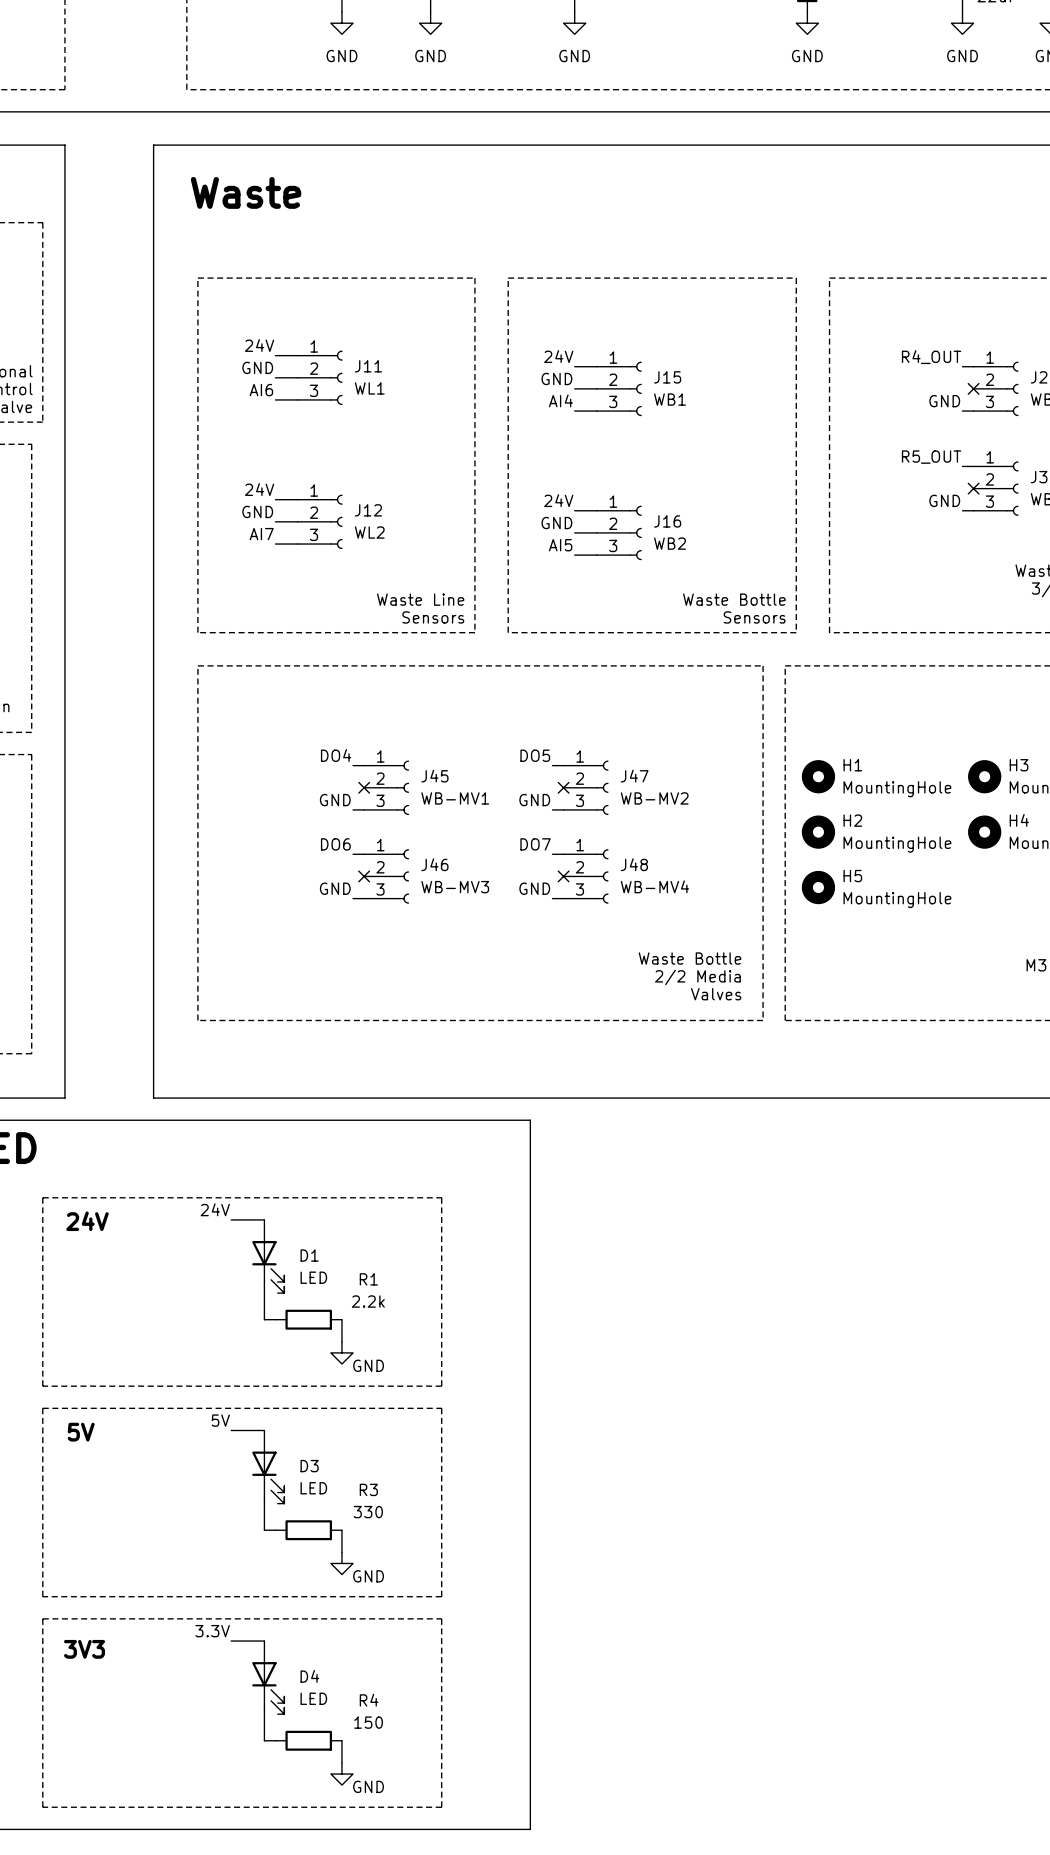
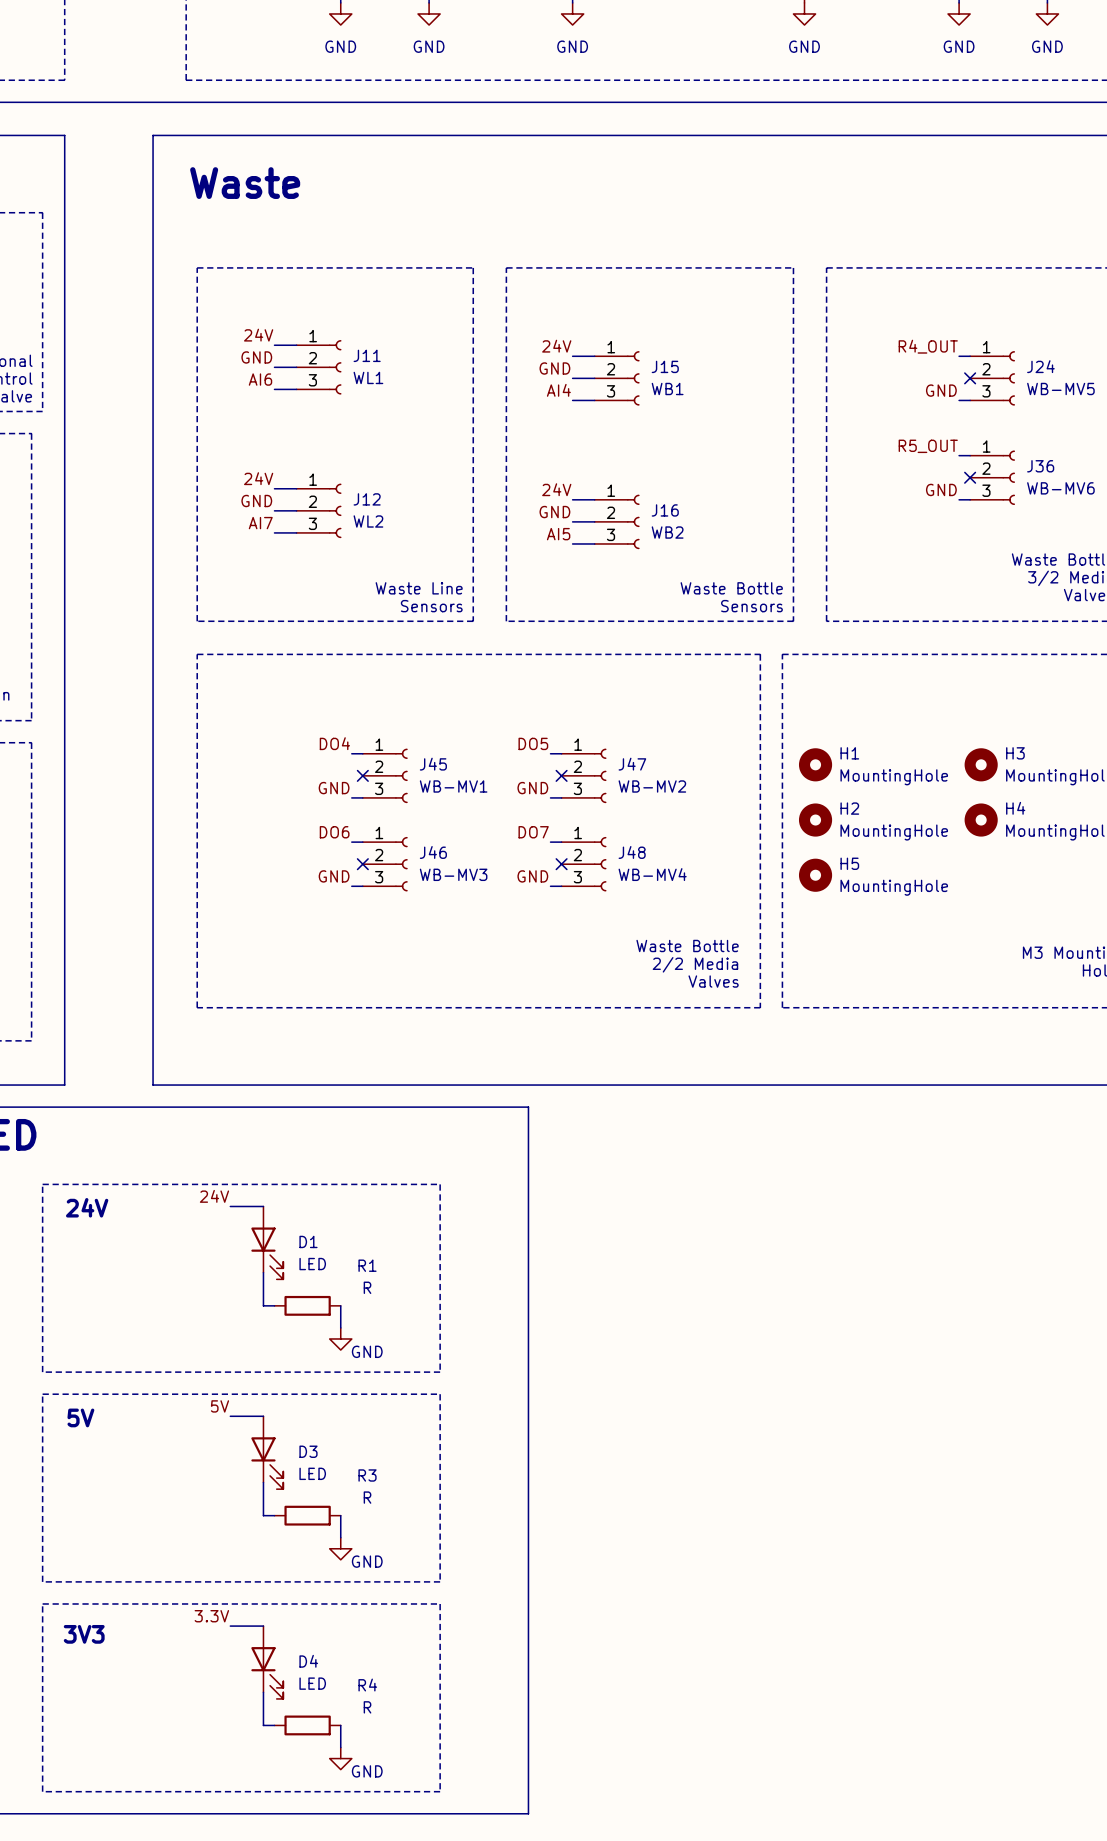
R1 value: 2.2k (368, 1301) -> R (367, 1287)
R3 value: 330 (368, 1512) -> R (367, 1497)
R4 value: 150 (368, 1722) -> R (367, 1707)

